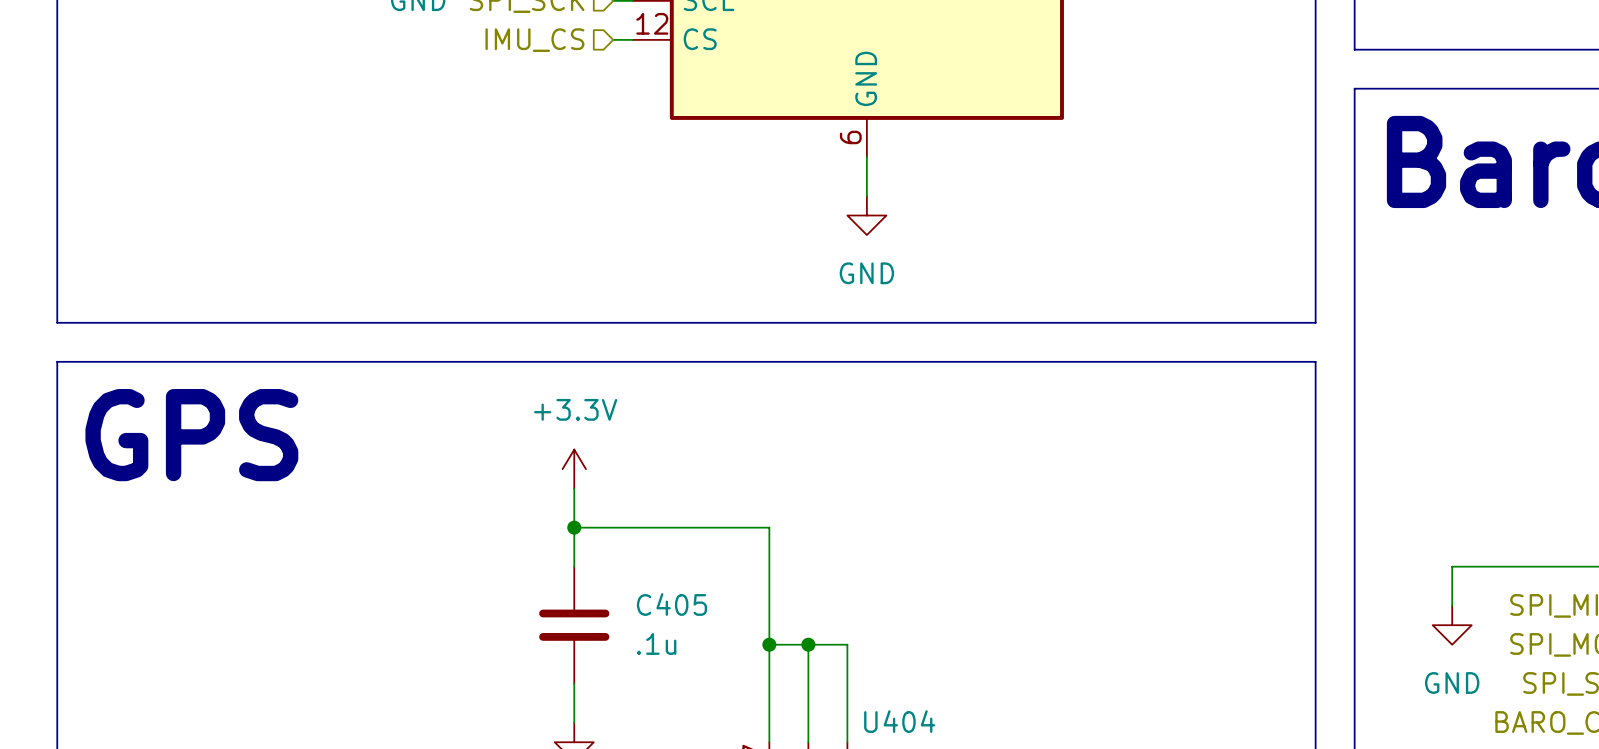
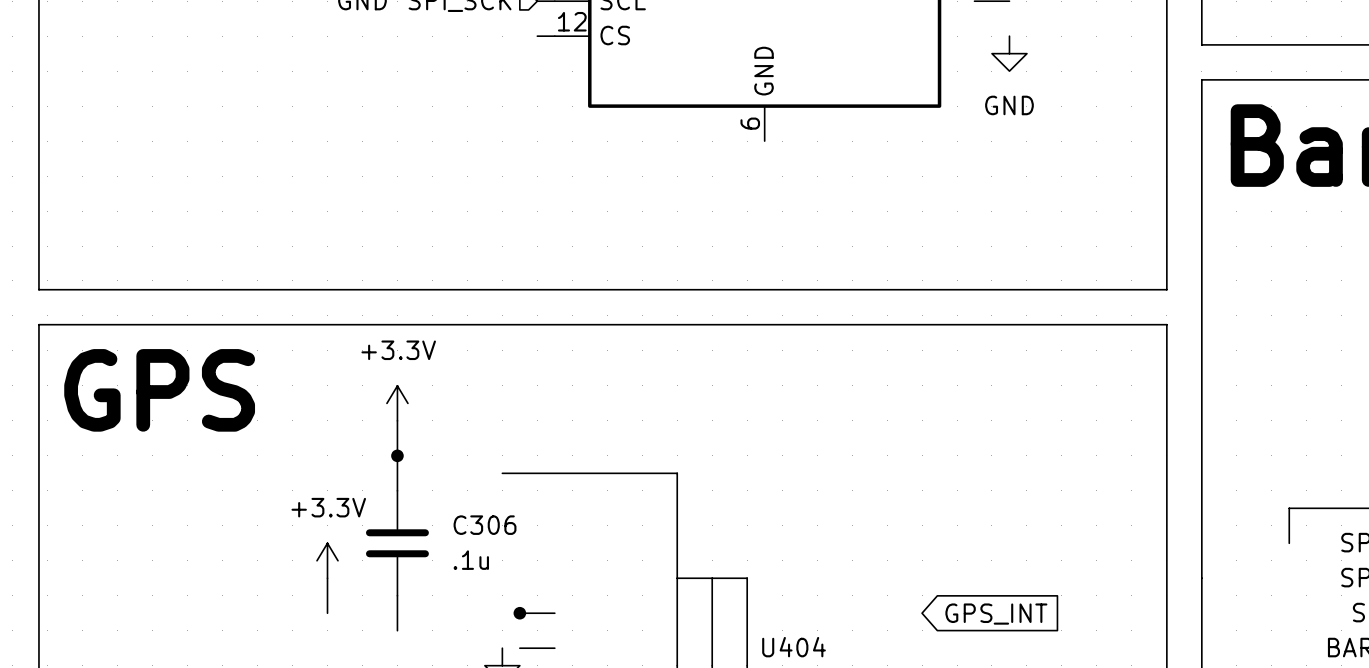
wire: none -> (974, 1) (1009, 1)
hierarchical label: IMU_CS (534, 40) -> none
wire: (866, 156) (866, 195) -> none
power symbol position: GND (866, 215) -> GND (1009, 53)
power symbol position: +3.3V (574, 469) -> +3.3V (397, 403)
wire: (574, 488) (574, 566) -> (397, 420) (397, 490)
junction: none -> (397, 455)
junction: (574, 527) -> none
C306: none -> .1u (397, 543)
power symbol: none -> +3.3V (327, 560)
C405: .1u (574, 625) -> none
power symbol: GND (1452, 625) -> none
wire: none -> (327, 578) (327, 613)
junction: (769, 644) -> none
junction: (808, 644) -> none
wire: (574, 683) (574, 722) -> (397, 595) (397, 630)
wire: none -> (519, 613) (554, 613)
junction: none -> (519, 613)
global label: none -> GPS_INT (996, 614)
wire: none -> (519, 648) (554, 648)

